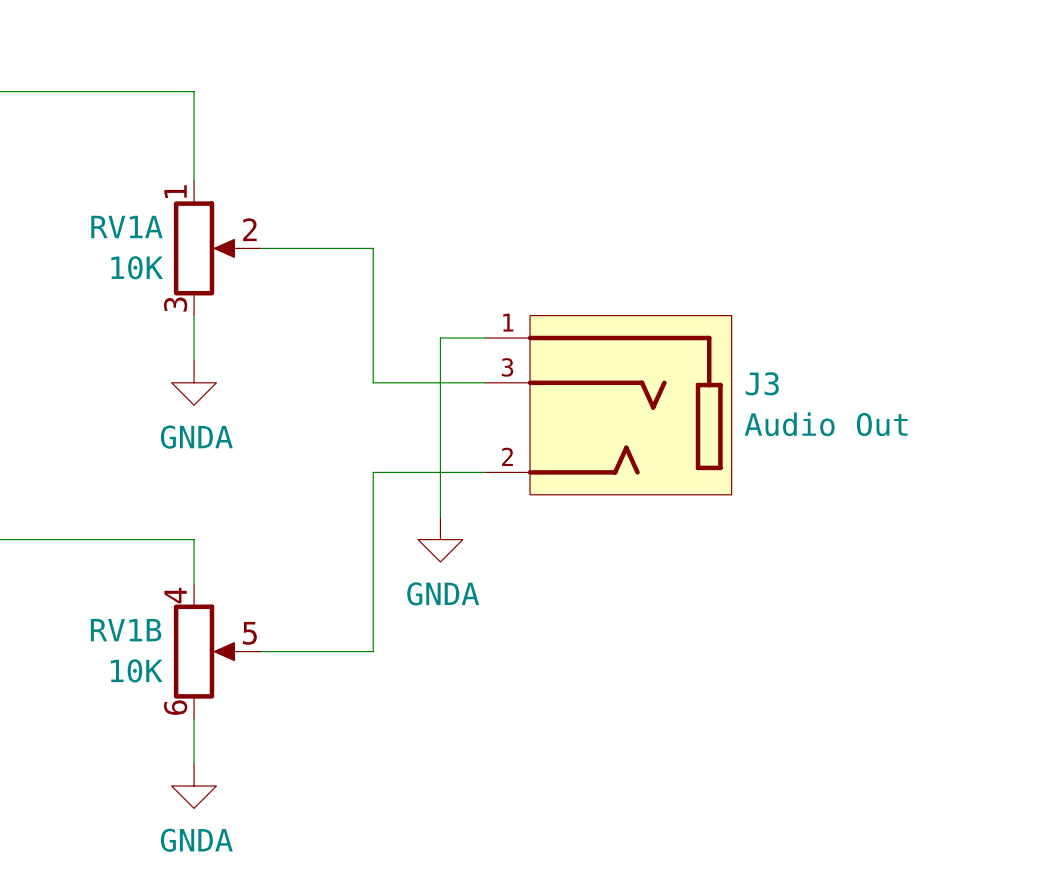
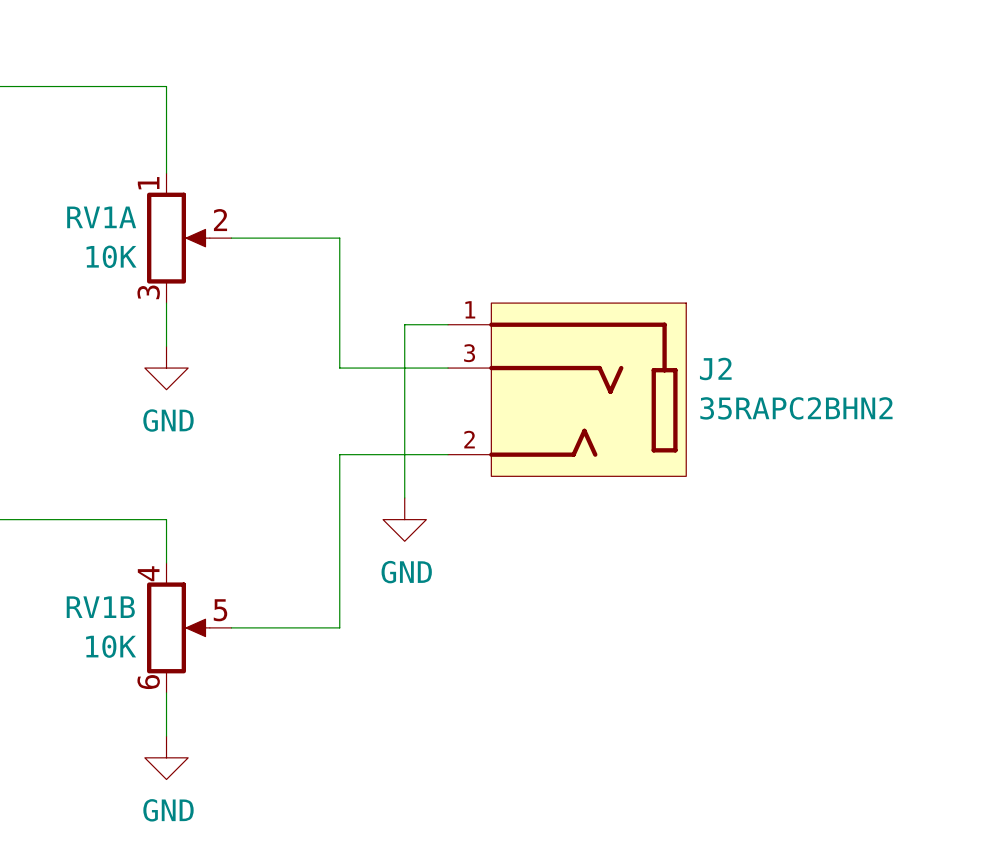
power symbol: GNDA (194, 382) -> GND (166, 368)
J3 name: J3 (762, 383) -> J2 (715, 368)
J3 value: Audio Out (826, 424) -> 35RAPC2BHN2 (796, 408)
power symbol: GNDA (440, 539) -> GND (404, 519)
power symbol: GNDA (194, 785) -> GND (166, 757)

